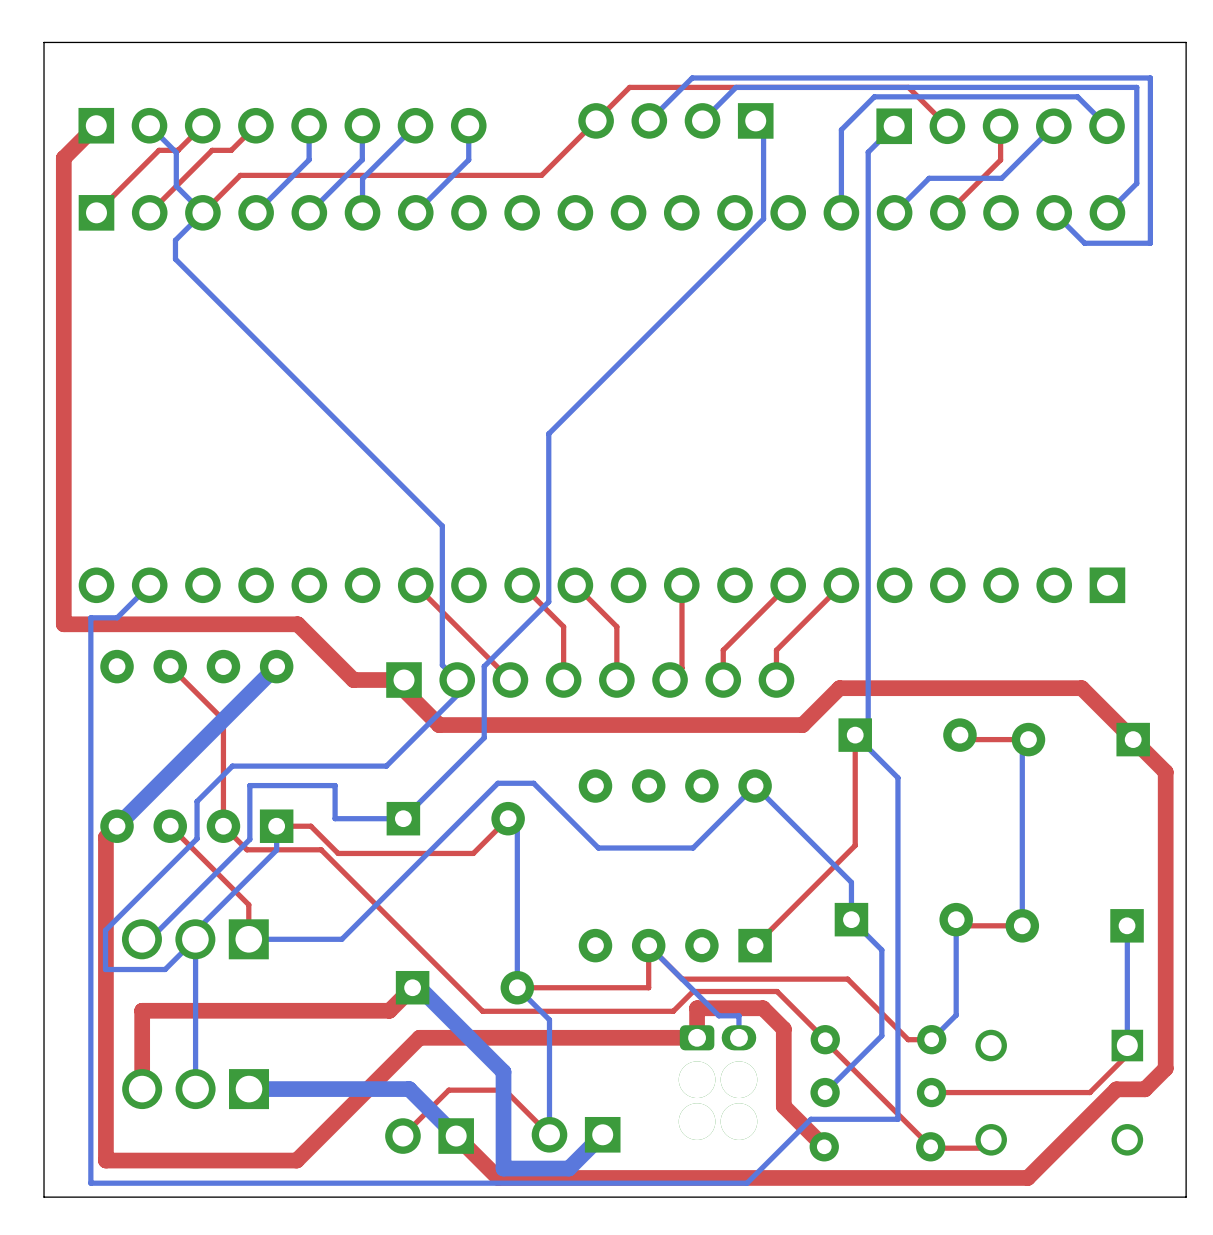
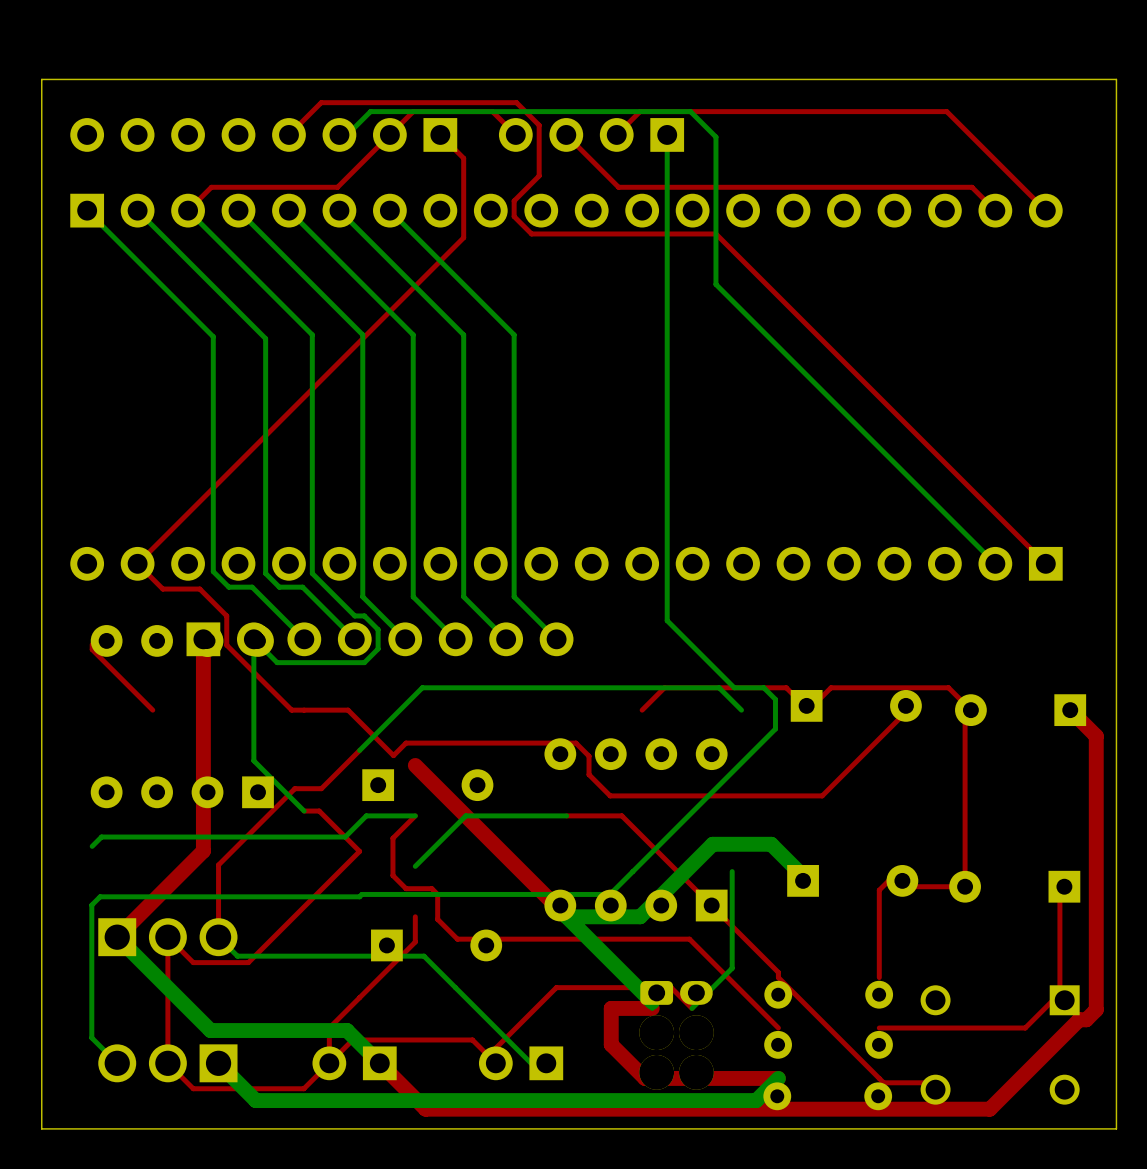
board edge: (1186, 42) (44, 42) (44, 1197) (1186, 1197) (1186, 42) -> (1116, 79) (1116, 1128) (41, 1128) (41, 79) (1116, 79)
bottom track: (649, 120) (692, 77) (1150, 77) (1150, 243) (1084, 243) (1054, 212) -> none
part position: (675, 120) -> (591, 134)
bottom track: (702, 120) (736, 87) (1136, 87) (1136, 183) (1105, 212) -> none
bottom track: (755, 120) (763, 128) (763, 219) (548, 433) (548, 601) (484, 666) (484, 737) (403, 818) (335, 818) (335, 785) (249, 785) (249, 839) (149, 939) (141, 939) -> none
top track: (96, 125) (63, 158) (63, 624) (297, 624) (353, 680) (404, 680) (404, 689) (439, 725) (802, 725) (839, 688) (1081, 688) (1151, 757) -> none
bottom track: (149, 125) (176, 152) (176, 186) (202, 212) (175, 240) (175, 259) (442, 526) (442, 665) (457, 680) (457, 695) (386, 766) (232, 766) (197, 801) (197, 838) (105, 930) (105, 969) (165, 969) (195, 939) (195, 931) (276, 850) (276, 826) -> none
top track: (202, 125) (178, 150) (158, 150) (96, 212) -> none
top track: (255, 125) (231, 150) (212, 150) (149, 212) -> none
part rotation: 0° (282, 125) -> 180° (263, 134)
bottom track: (309, 125) (309, 159) (256, 212) -> (405, 639) (362, 596) (362, 334) (238, 210)
bottom track: (362, 125) (362, 159) (309, 212) -> (455, 639) (413, 596) (413, 334) (288, 210)
bottom track: (415, 125) (362, 178) (362, 212) -> (506, 639) (463, 596) (463, 334) (339, 210)
bottom track: (468, 125) (468, 159) (415, 212) -> (556, 639) (514, 596) (514, 334) (389, 210)
bottom track: (894, 126) (868, 152) (868, 722) (855, 735) (897, 777) (897, 1119) (810, 1119) (747, 1183) (90, 1183) (90, 617) (117, 617) (149, 585) -> none
top track: (947, 126) (908, 87) (629, 87) (541, 175) (240, 175) (227, 188) -> (515, 134) (492, 111) (413, 111) (337, 187) (211, 187)
top track: (1000, 126) (1000, 160) (947, 212) -> none
part: (1000, 126) -> none
bottom track: (1053, 126) (1001, 178) (929, 178) (894, 212) -> none
bottom track: (1107, 126) (1077, 96) (874, 96) (841, 129) (841, 212) -> none
top track: none -> (288, 134) (321, 102) (516, 102) (539, 125) (539, 175) (514, 200) (514, 216) (531, 233) (715, 233) (1045, 563)
bottom track: none -> (339, 134) (347, 134) (370, 111) (690, 111) (715, 137) (715, 284) (995, 563)
top track: none -> (440, 134) (463, 158) (463, 237) (137, 563) (162, 589) (199, 589) (226, 615) (226, 645) (291, 710) (348, 710) (393, 755) (406, 743) (575, 743) (589, 756) (589, 774) (610, 795) (822, 795) (907, 710)
top track: none -> (566, 134) (618, 187) (972, 187) (995, 210)
top track: none -> (616, 134) (640, 111) (946, 111) (1045, 210)
bottom track: none -> (667, 134) (667, 620) (734, 687) (763, 687) (775, 699) (775, 728) (610, 894) (100, 896) (91, 905) (91, 1037) (117, 1063)
bottom track: none -> (87, 210) (213, 336) (213, 571) (228, 587) (252, 587) (304, 639)
bottom track: none -> (137, 210) (265, 338) (265, 573) (279, 587) (302, 587) (354, 639)
bottom track: none -> (188, 210) (312, 334) (312, 573) (354, 615) (364, 615) (378, 629) (378, 648) (364, 662) (277, 662) (253, 639) (253, 760) (304, 811)
top track: (415, 585) (510, 680) -> none
top track: (522, 585) (563, 626) (563, 680) -> none
top track: (575, 585) (616, 626) (616, 680) -> none
top track: (681, 585) (681, 668) (670, 680) -> none
top track: (788, 585) (723, 650) (723, 680) -> none
top track: (841, 585) (776, 650) (776, 680) -> none
top track: none -> (203, 639) (203, 851) (117, 937)
top track: (170, 666) (223, 719) (223, 826) (247, 849) (321, 849) (482, 1011) (673, 1011) (693, 991) (777, 991) (932, 1148) (992, 1148) -> none
bottom track: (276, 666) (117, 826) -> none
top track: none -> (92, 644) (92, 649) (152, 710)
part position: (590, 680) -> (380, 639)
top track: (855, 735) (855, 845) (755, 945) -> none
top track: (959, 735) (964, 739) (1028, 739) -> none
top track: none -> (642, 710) (664, 687) (786, 687) (808, 710) (831, 687) (948, 687) (970, 710) (965, 715) (965, 886)
bottom track: none -> (741, 710) (719, 687) (422, 687) (359, 750)
bottom track: (1028, 739) (1022, 745) (1022, 925) -> none
top track: (1160, 767) (1165, 772) (1165, 1068) (1144, 1089) (1116, 1089) (1027, 1177) (498, 1177) (456, 1136) -> (1096, 736) (1096, 1009) (1086, 1019) (1079, 1019) (989, 1109) (425, 1109) (379, 1063)
top track: none -> (359, 750) (321, 788) (294, 788) (218, 865) (218, 937)
top track: none -> (415, 765) (566, 916)
top track: (276, 816) (276, 826) (310, 826) (338, 853) (473, 853) (508, 818) -> none
bottom track: (508, 818) (517, 827) (517, 987) (549, 1019) (549, 1134) -> none
top track: (117, 826) (105, 837) (105, 1160) (296, 1160) (419, 1037) (697, 1037) (697, 1008) (763, 1008) (783, 1029) (783, 1106) (824, 1146) -> none
top track: (170, 826) (248, 904) (248, 939) -> none
top track: none -> (304, 811) (319, 811) (359, 851) (248, 962) (193, 962) (167, 937) (167, 1063) (193, 1088) (303, 1088) (352, 1039) (472, 1039) (495, 1063) (495, 1048) (556, 987) (671, 987) (691, 1008)
top track: none -> (415, 815) (392, 838) (392, 875) (406, 888) (431, 888) (437, 894) (437, 919) (457, 939) (689, 939) (778, 1028)
bottom track: none -> (415, 815) (366, 815) (345, 837) (101, 837) (92, 846)
top track: none -> (566, 815) (621, 815) (778, 972) (778, 977) (883, 1082) (930, 1082)
bottom track: none -> (566, 815) (465, 815) (415, 866)
bottom track: none -> (732, 871) (732, 968) (691, 1008)
bottom track: none -> (798, 871) (771, 844) (712, 844) (640, 916) (566, 916) (652, 1002) (652, 1008)
top track: none -> (897, 871) (879, 890) (879, 977)
bottom track: (956, 919) (956, 1015) (931, 1039) -> none
top track: none -> (1064, 886) (1059, 891) (1059, 993) (1025, 1028) (879, 1028)
bottom track: (1127, 926) (1127, 1045) -> none
bottom track: (195, 939) (195, 1089) -> none
part rotation: 0° (195, 939) -> 180° (167, 937)
bottom track: (248, 939) (341, 939) (497, 783) (533, 783) (598, 848) (693, 848) (755, 786) (851, 882) (851, 919) (881, 950) (881, 1035) (825, 1092) -> none
bottom track: (648, 945) (718, 1015) (738, 1015) (738, 1037) -> none
top track: none -> (415, 916) (415, 942) (329, 1028) (329, 1063)
bottom track: none -> (117, 937) (210, 1030) (347, 1030) (379, 1063)
bottom track: none -> (218, 937) (237, 956) (424, 956) (531, 1063) (546, 1063)
top track: (412, 987) (389, 1010) (142, 1010) (142, 1089) -> none
bottom track: (412, 987) (419, 987) (503, 1071) (503, 1168) (568, 1168) (602, 1134) -> none
top track: (517, 987) (648, 987) (648, 945) (682, 979) (847, 979) (908, 1039) (931, 1039) -> none
top track: (1128, 1053) (1089, 1092) (931, 1092) -> none
top track: none -> (652, 1008) (611, 1008) (611, 1044) (645, 1078) (778, 1078)
part position: (195, 1089) -> (167, 1063)
bottom track: (249, 1089) (409, 1089) (456, 1136) -> none
bottom track: none -> (218, 1063) (255, 1100) (756, 1100) (778, 1078)
top track: (549, 1134) (504, 1090) (448, 1090) (402, 1136) -> none
part position: (576, 1134) -> (521, 1063)
part position: (429, 1136) -> (354, 1063)

